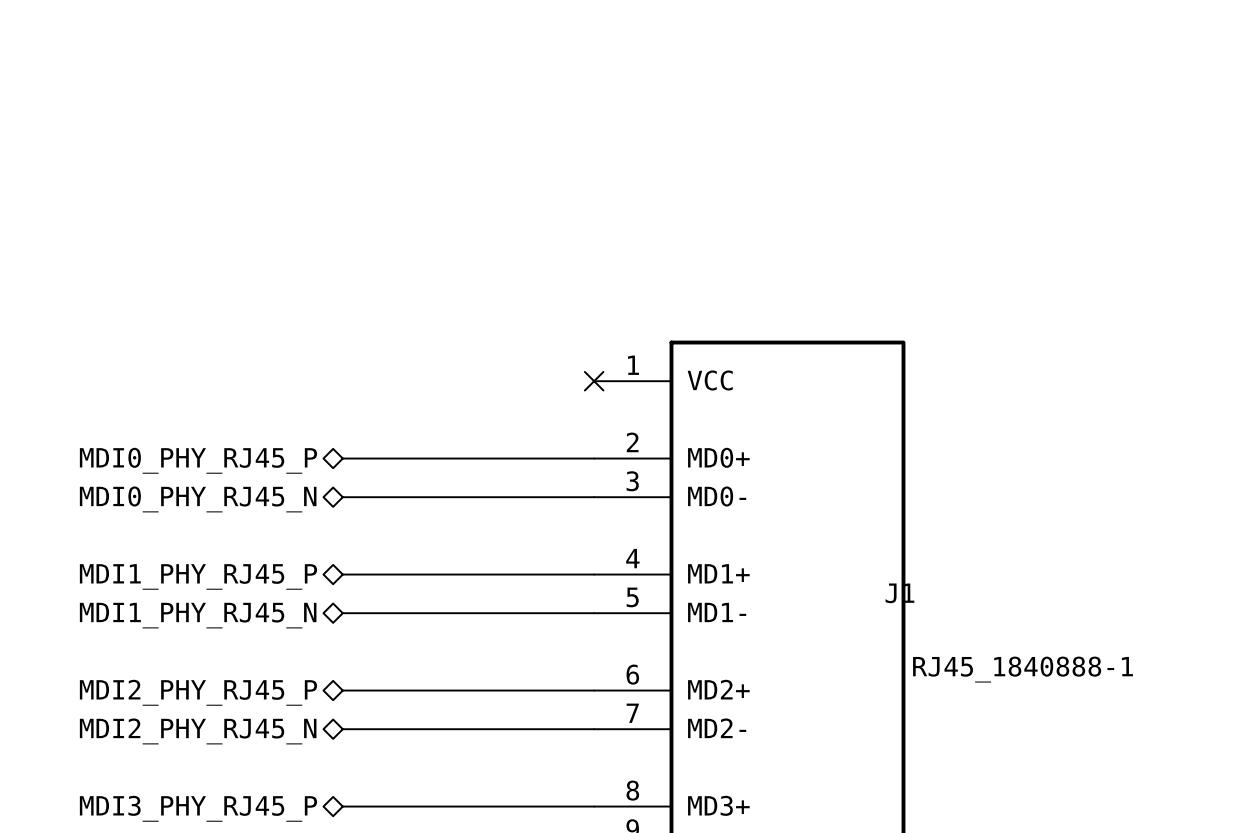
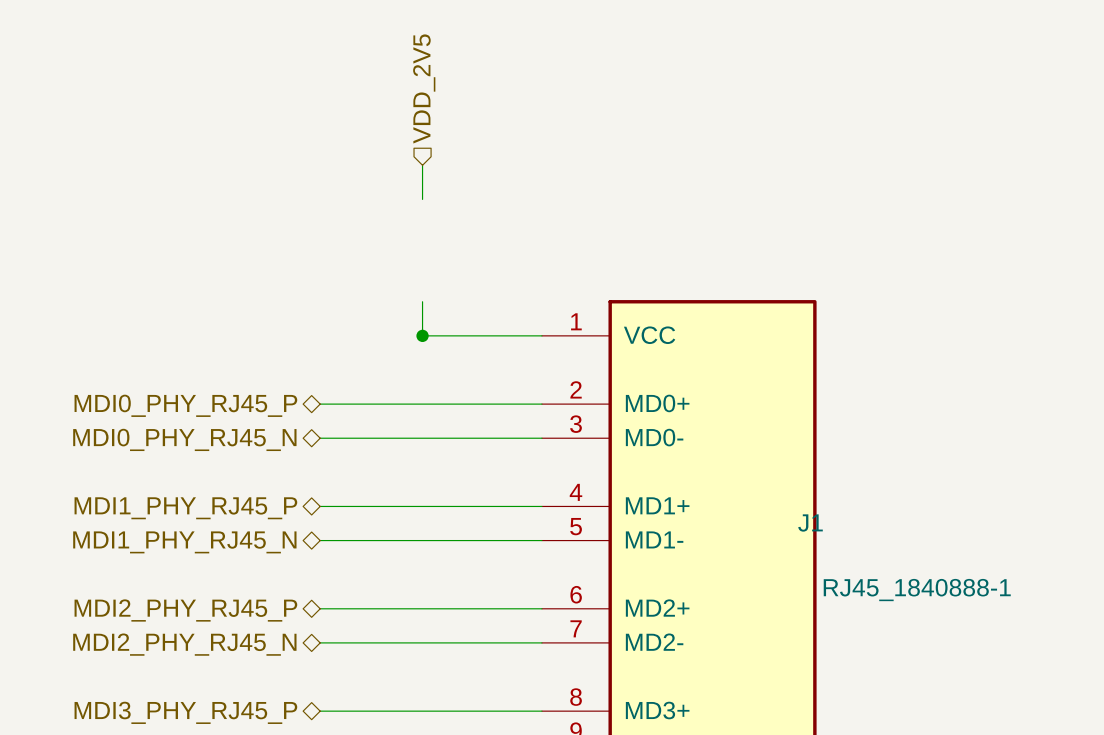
hierarchical label: none -> VDD_2V5 (424, 88)
wire: none -> (422, 165) (422, 199)
wire: none -> (422, 301) (422, 335) (541, 335)
junction: none -> (422, 335)
no-connect mark: (594, 381) -> none

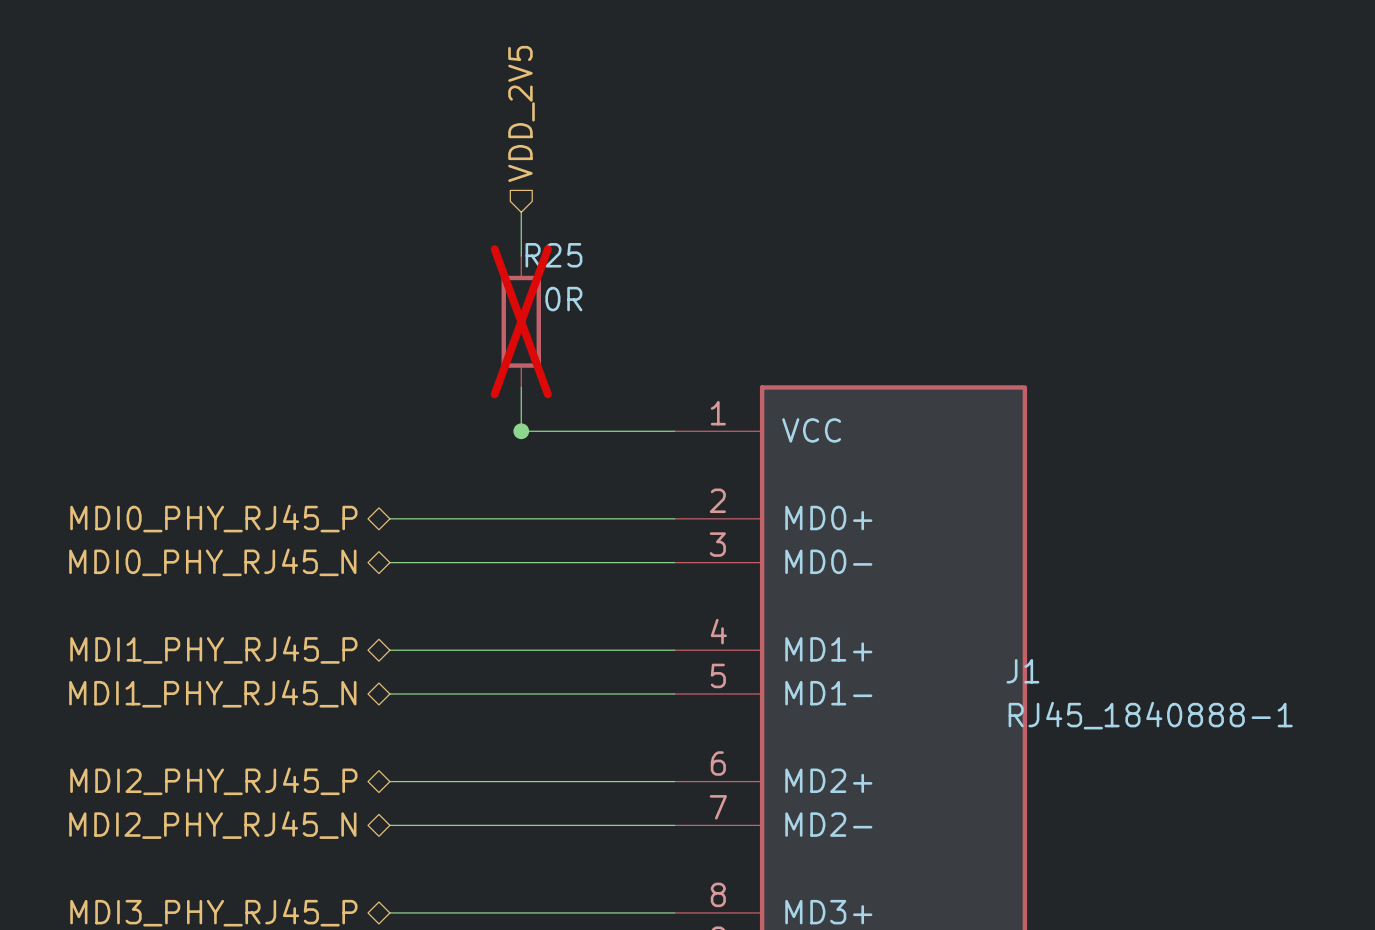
R25: none -> 0R (521, 321)
J1 value position: RJ45_1840888-1 (917, 590) -> RJ45_1840888-1 (1150, 715)

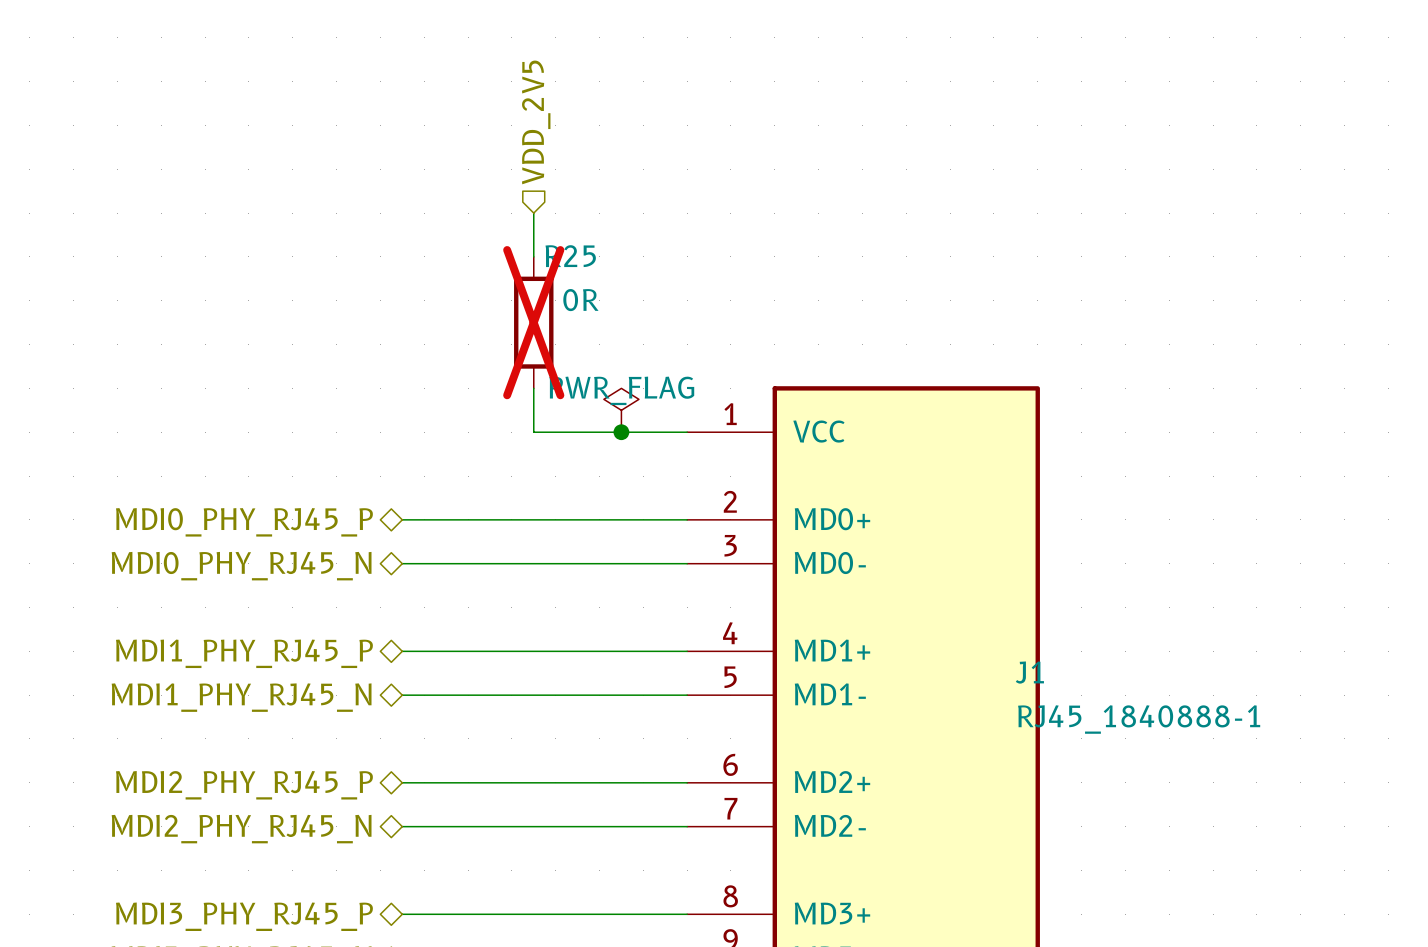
power symbol: none -> PWR_FLAG (621, 410)
junction position: (521, 431) -> (621, 432)

